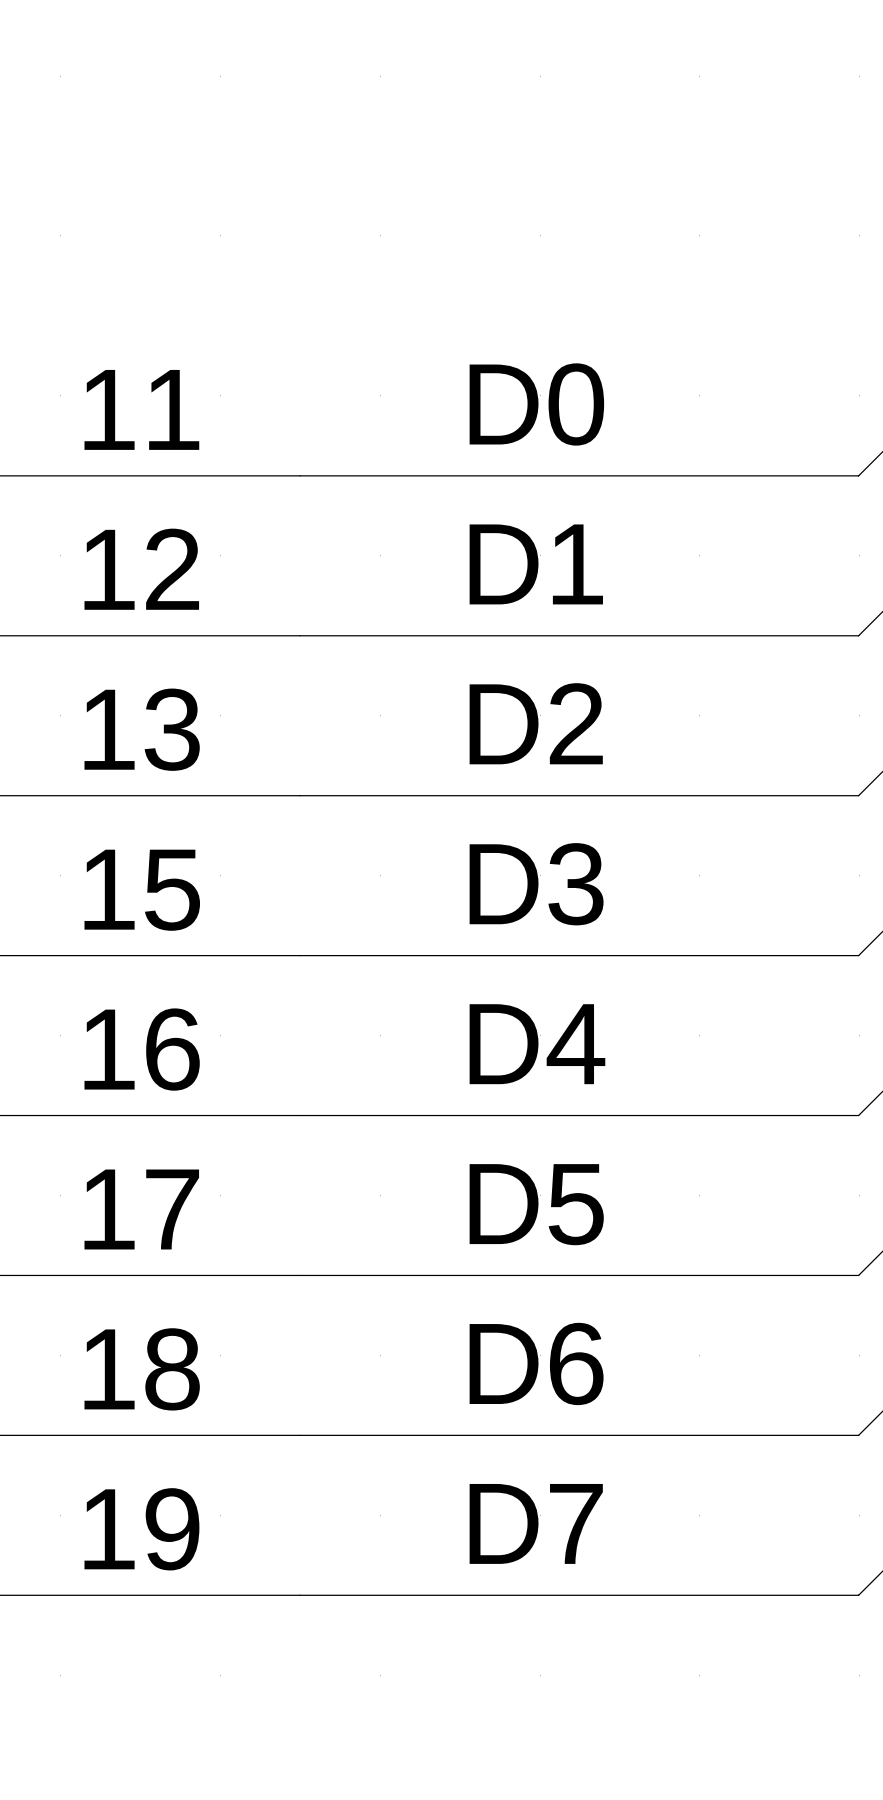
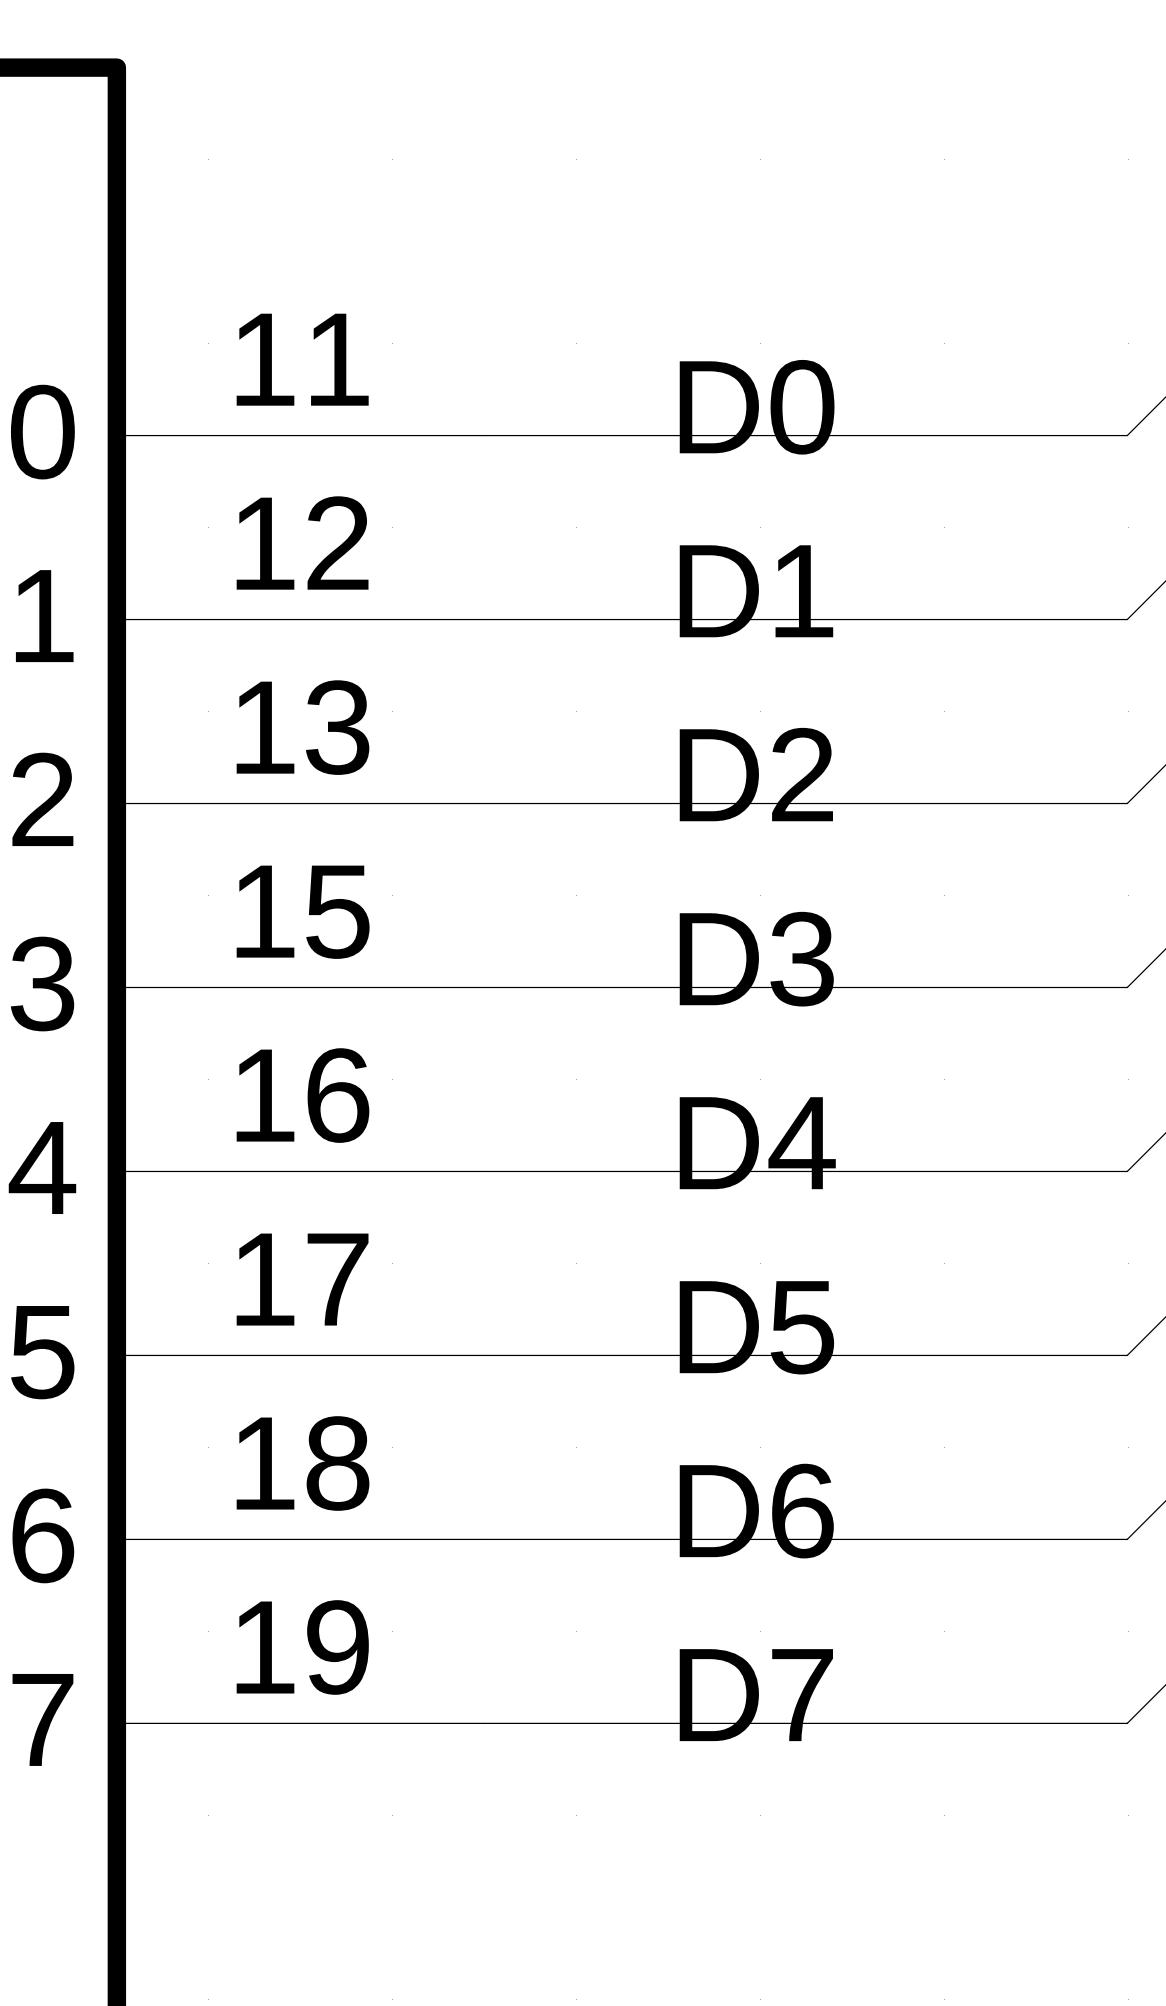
label position: D0 (536, 404) -> D0 (757, 407)
label position: D1 (536, 564) -> D1 (756, 591)
label position: D2 (536, 723) -> D2 (756, 774)
label position: D3 (536, 884) -> D3 (756, 959)
label position: D4 (537, 1044) -> D4 (757, 1143)
label position: D5 (536, 1204) -> D5 (756, 1327)
label position: D6 (536, 1363) -> D6 (756, 1511)
label position: D7 (536, 1523) -> D7 (756, 1695)

